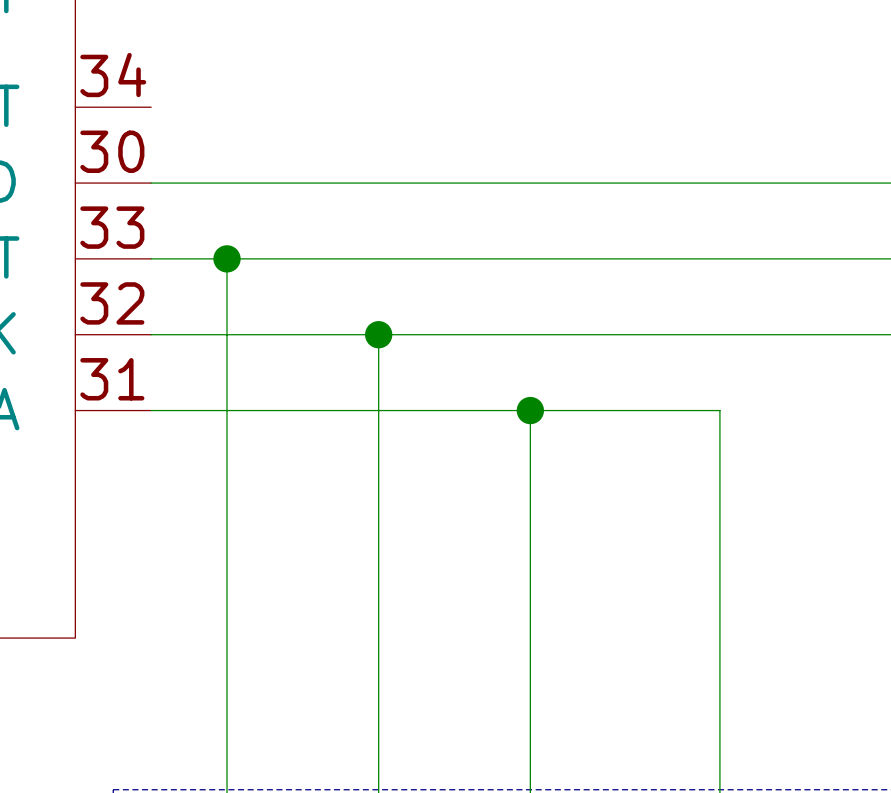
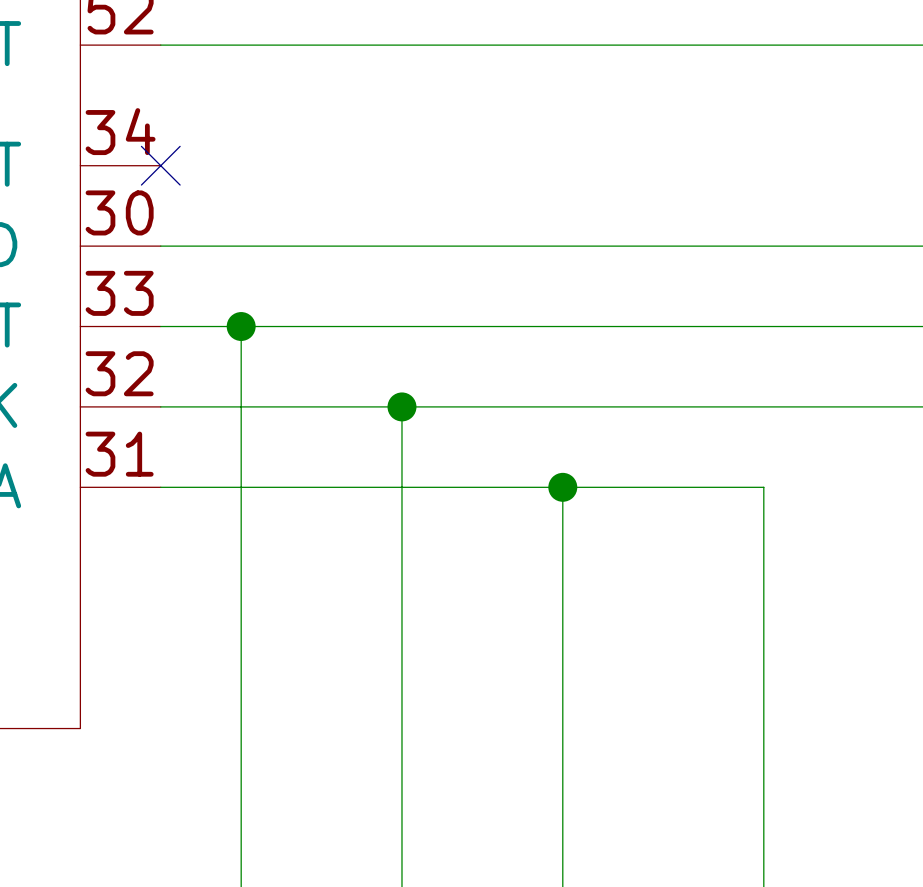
no-connect mark: none -> (160, 165)

